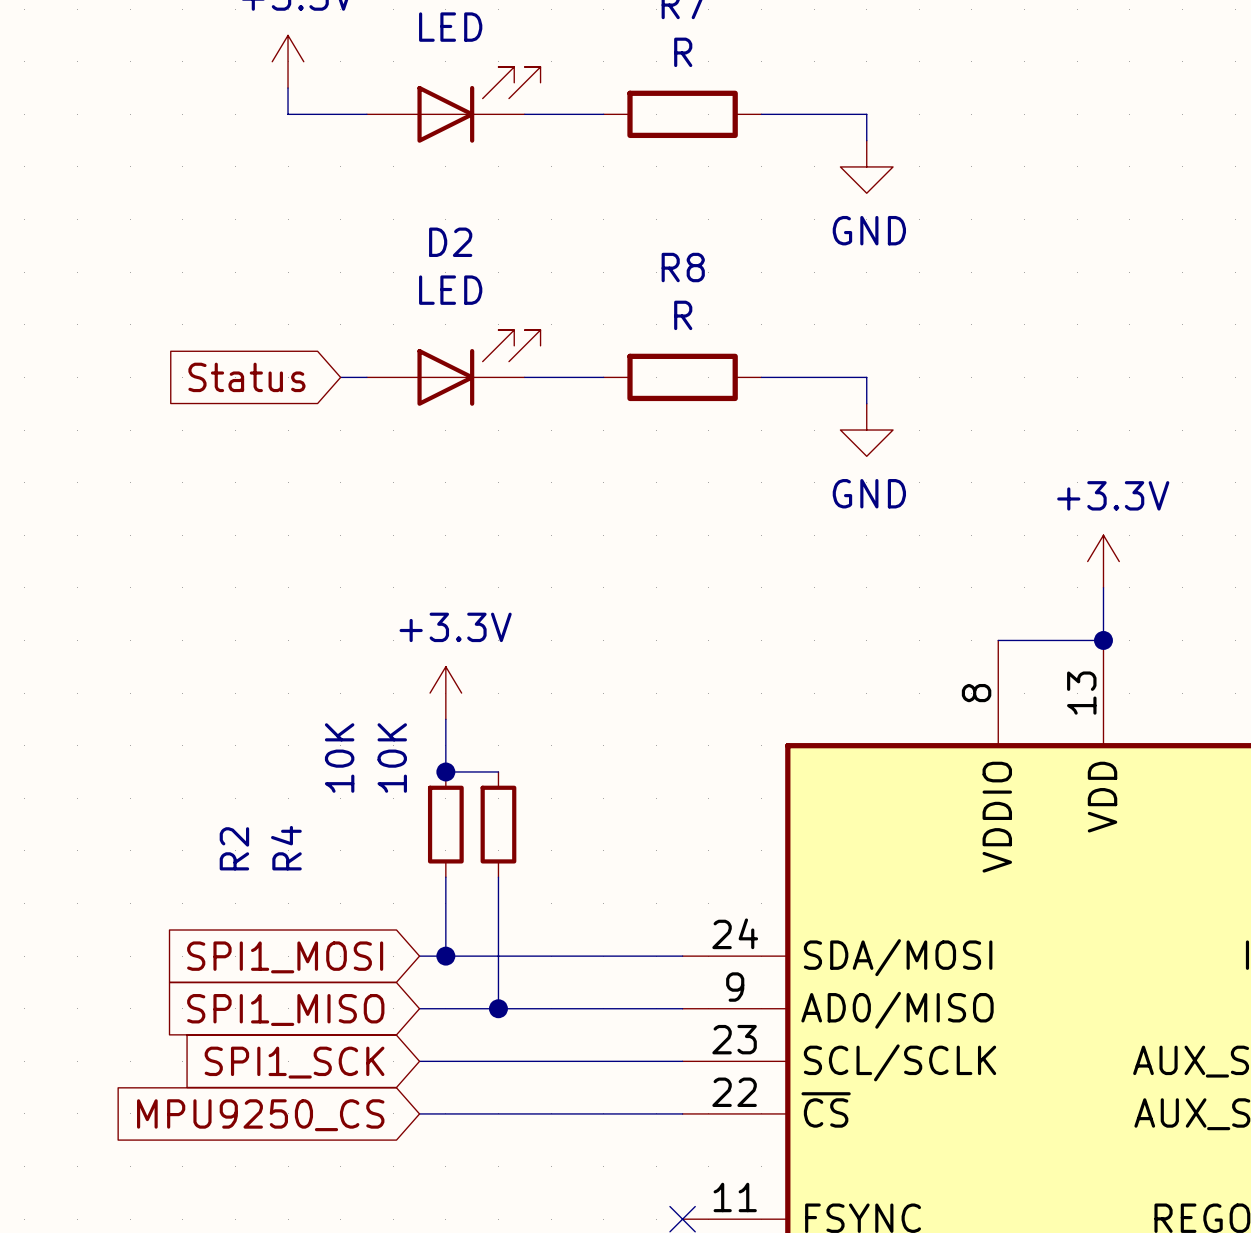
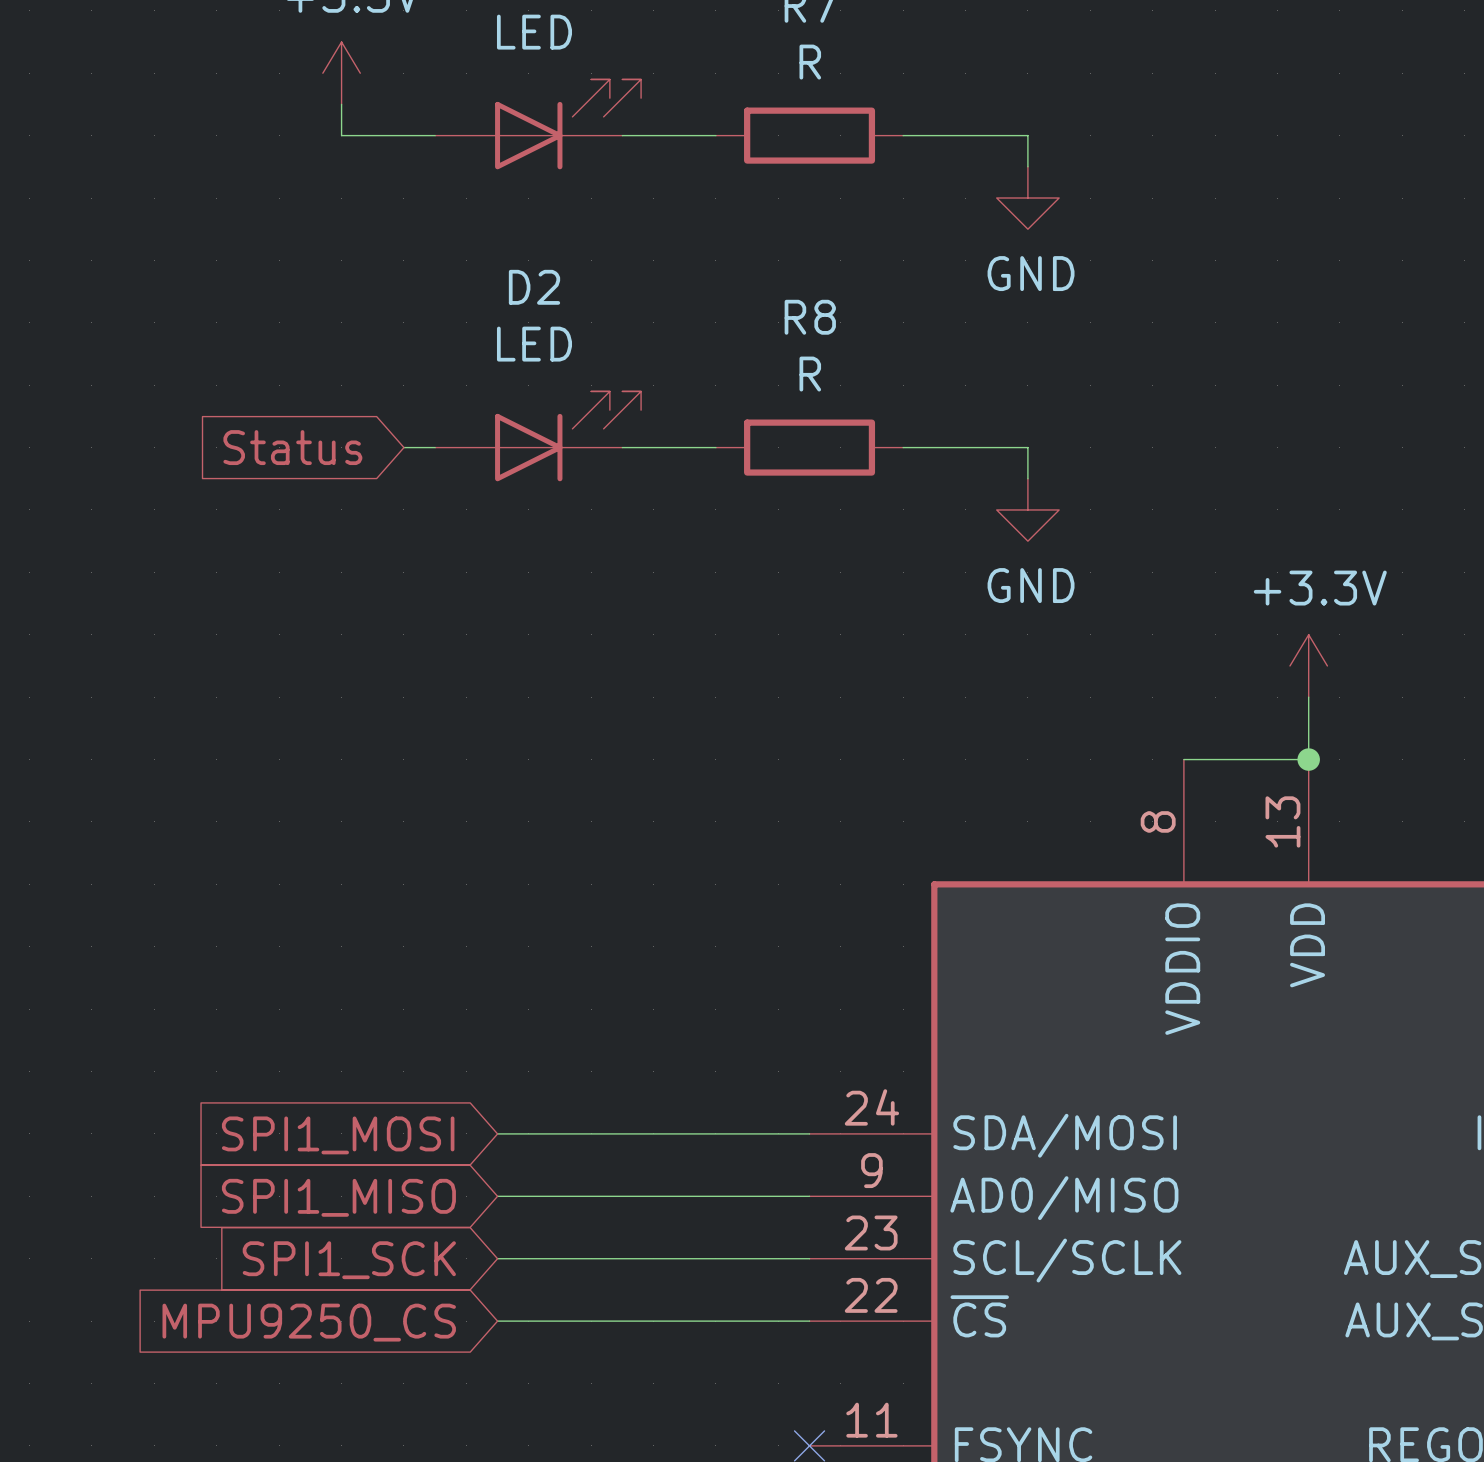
power symbol: +3.3V (445, 693) -> none
wire: (445, 719) (445, 771) (498, 771) -> none
junction: (445, 771) -> none
R2: 10K (445, 824) -> none
R4: 10K (498, 824) -> none
wire: (445, 877) (445, 956) -> none
wire: (498, 877) (498, 1008) -> none
junction: (445, 956) -> none
junction: (498, 1008) -> none

